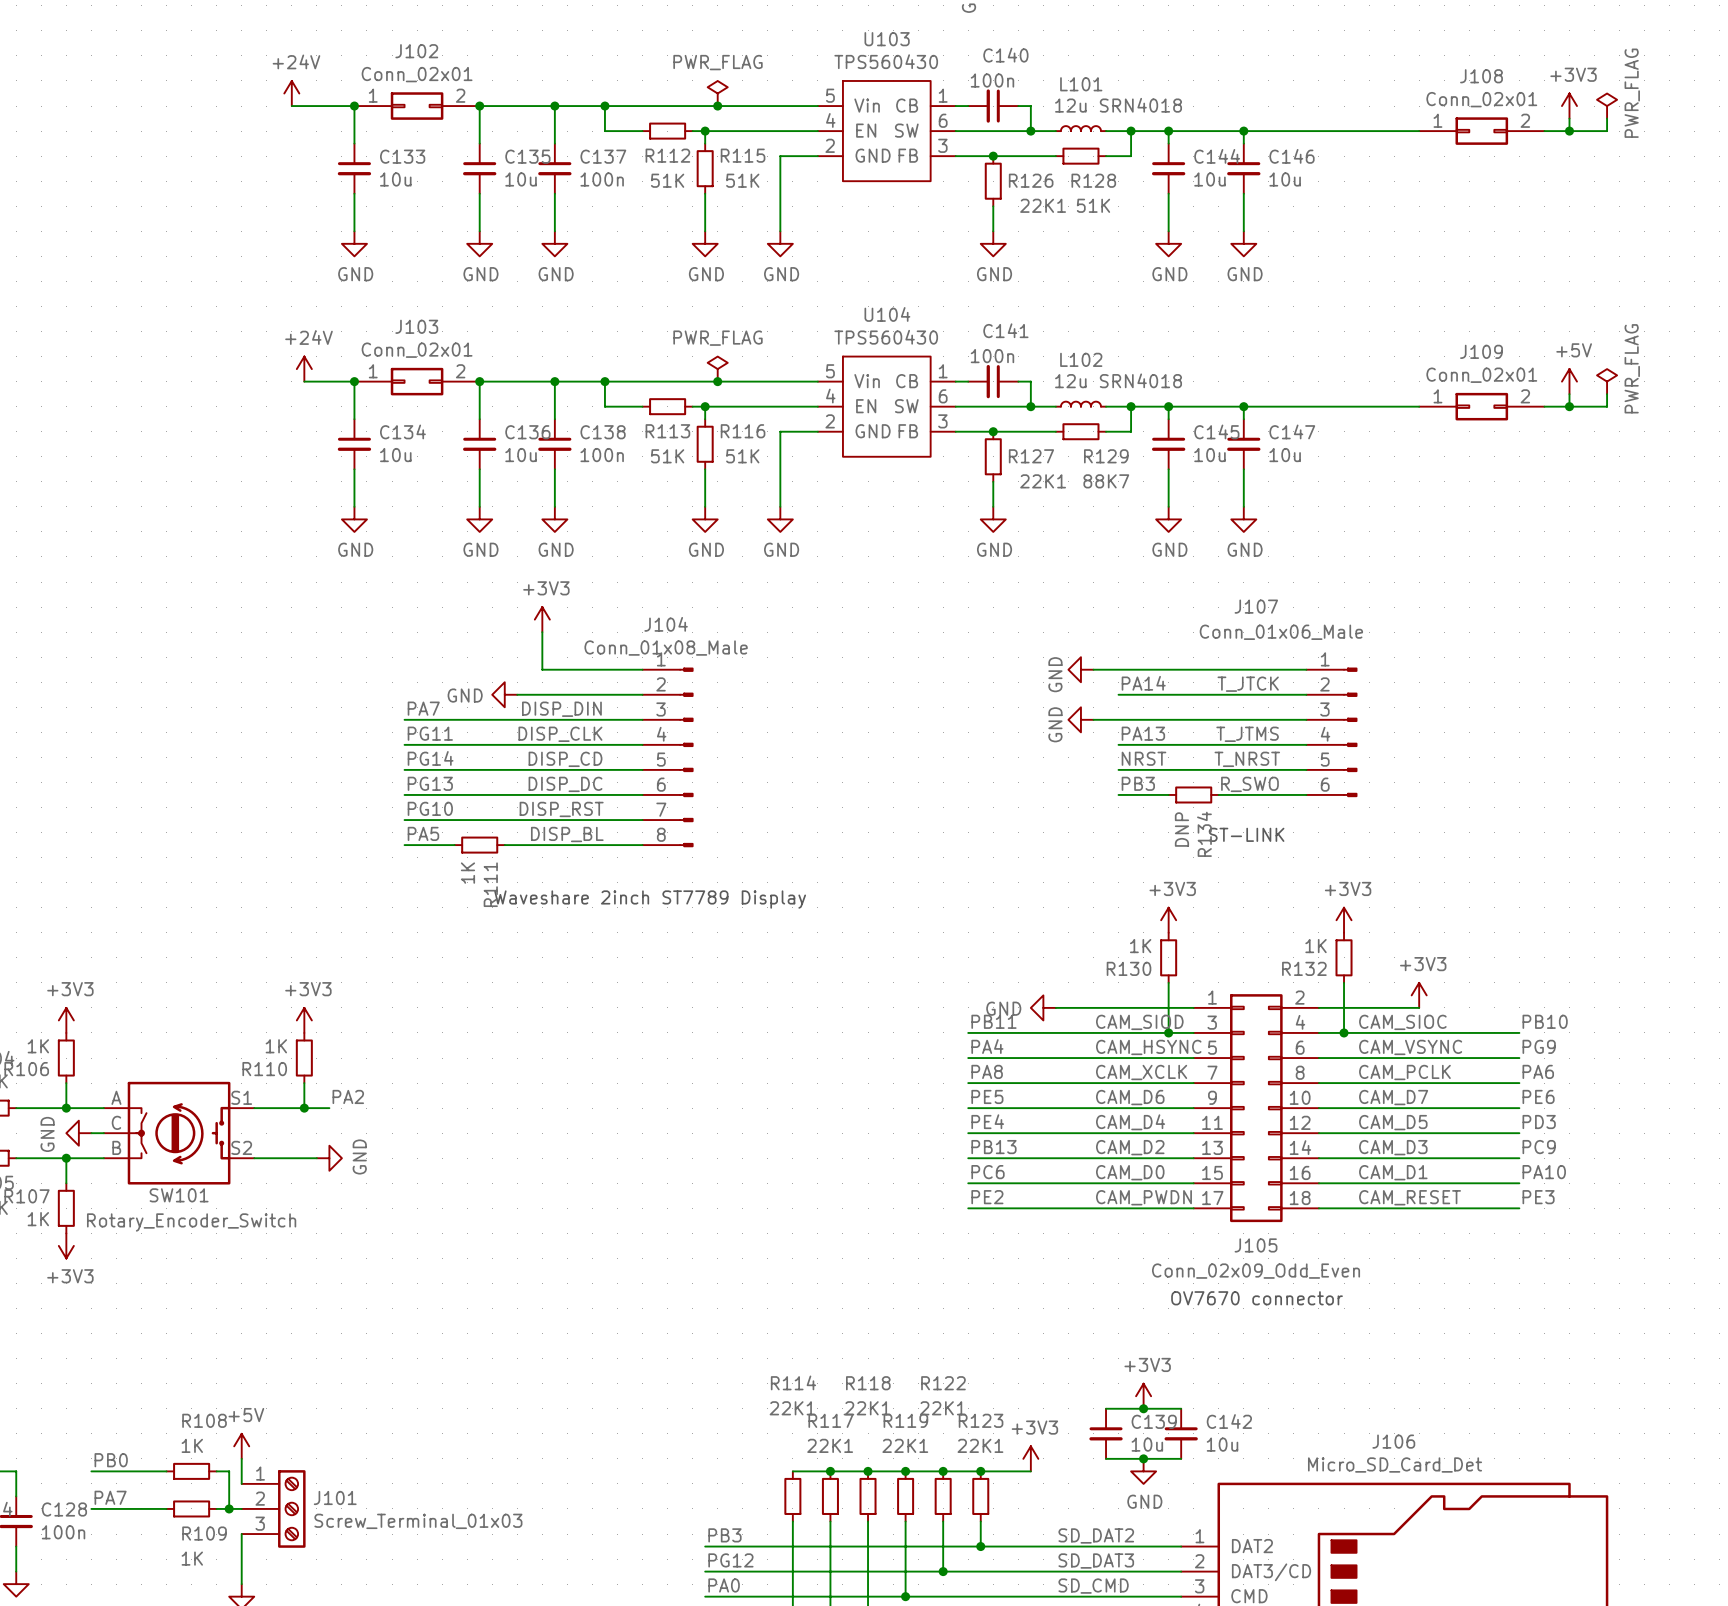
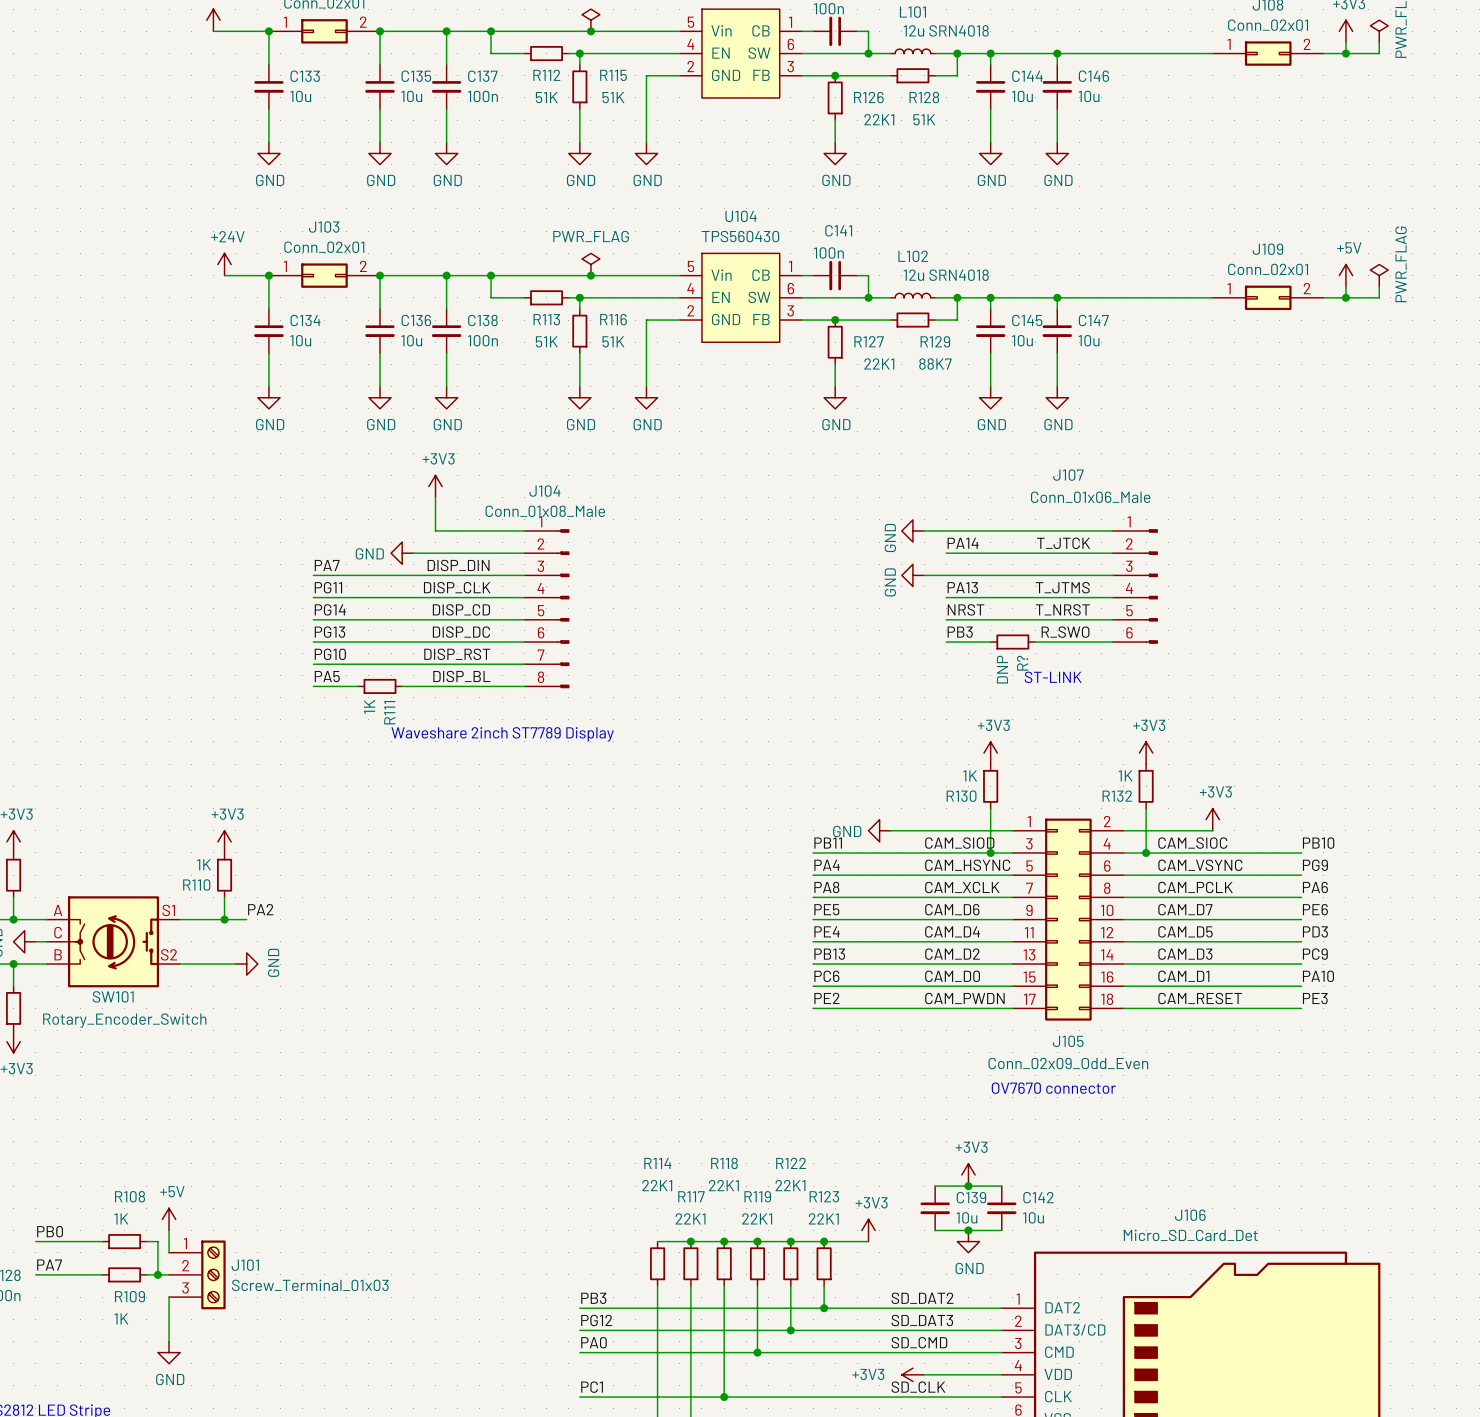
R134 name: R134 (1204, 834) -> R? (1022, 663)

